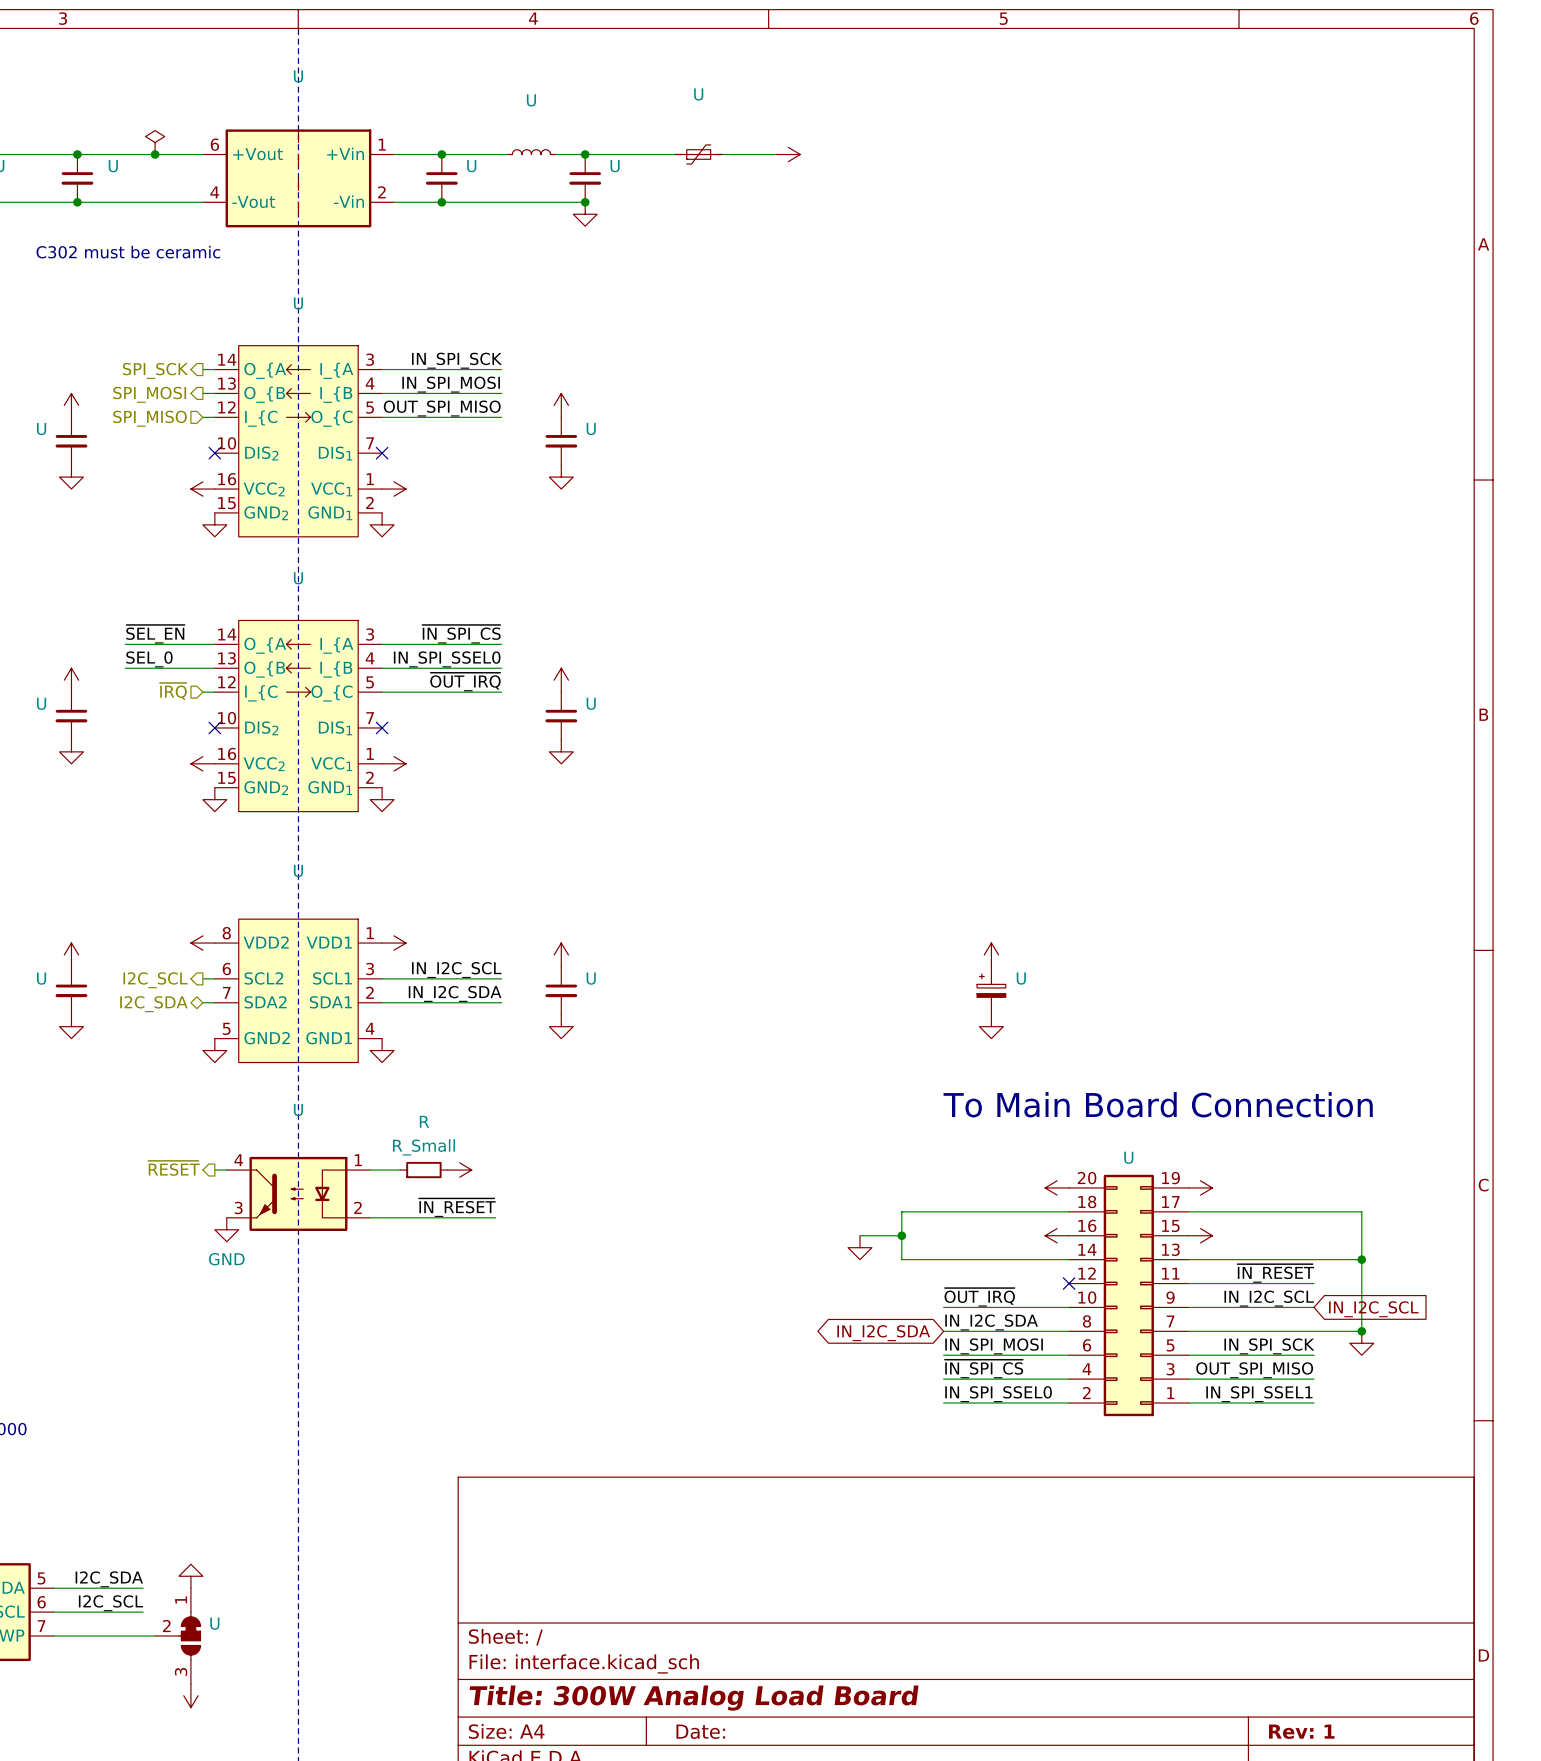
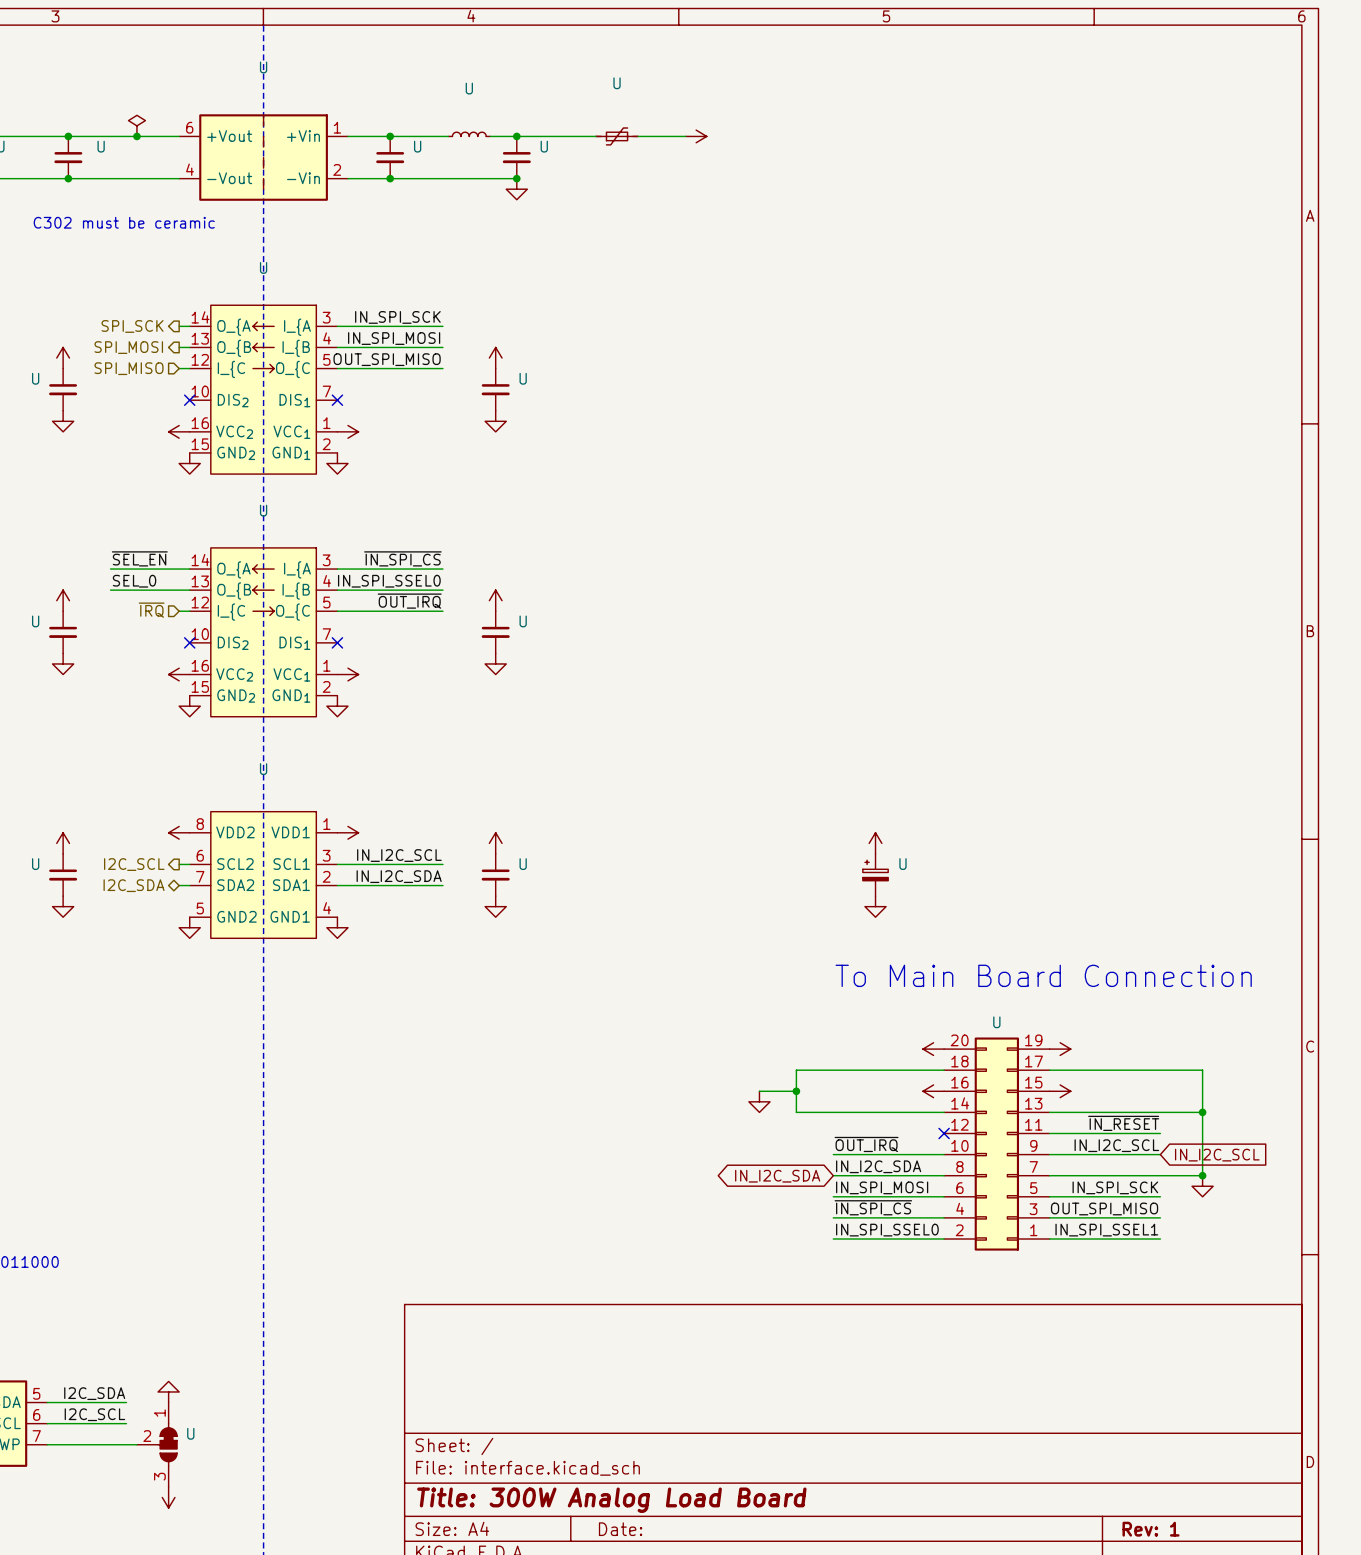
hierarchical label: ~{RESET} (174, 1168) -> none
wire: (214, 1170) (226, 1170) -> none
wire: (370, 1170) (400, 1170) -> none
R: R_Small (423, 1170) -> none
power symbol: (459, 1170) -> none
U: (298, 1193) -> none
label: ~{IN_RESET} (457, 1207) -> none
wire: (370, 1217) (495, 1217) -> none
power symbol: GND (226, 1229) -> none

